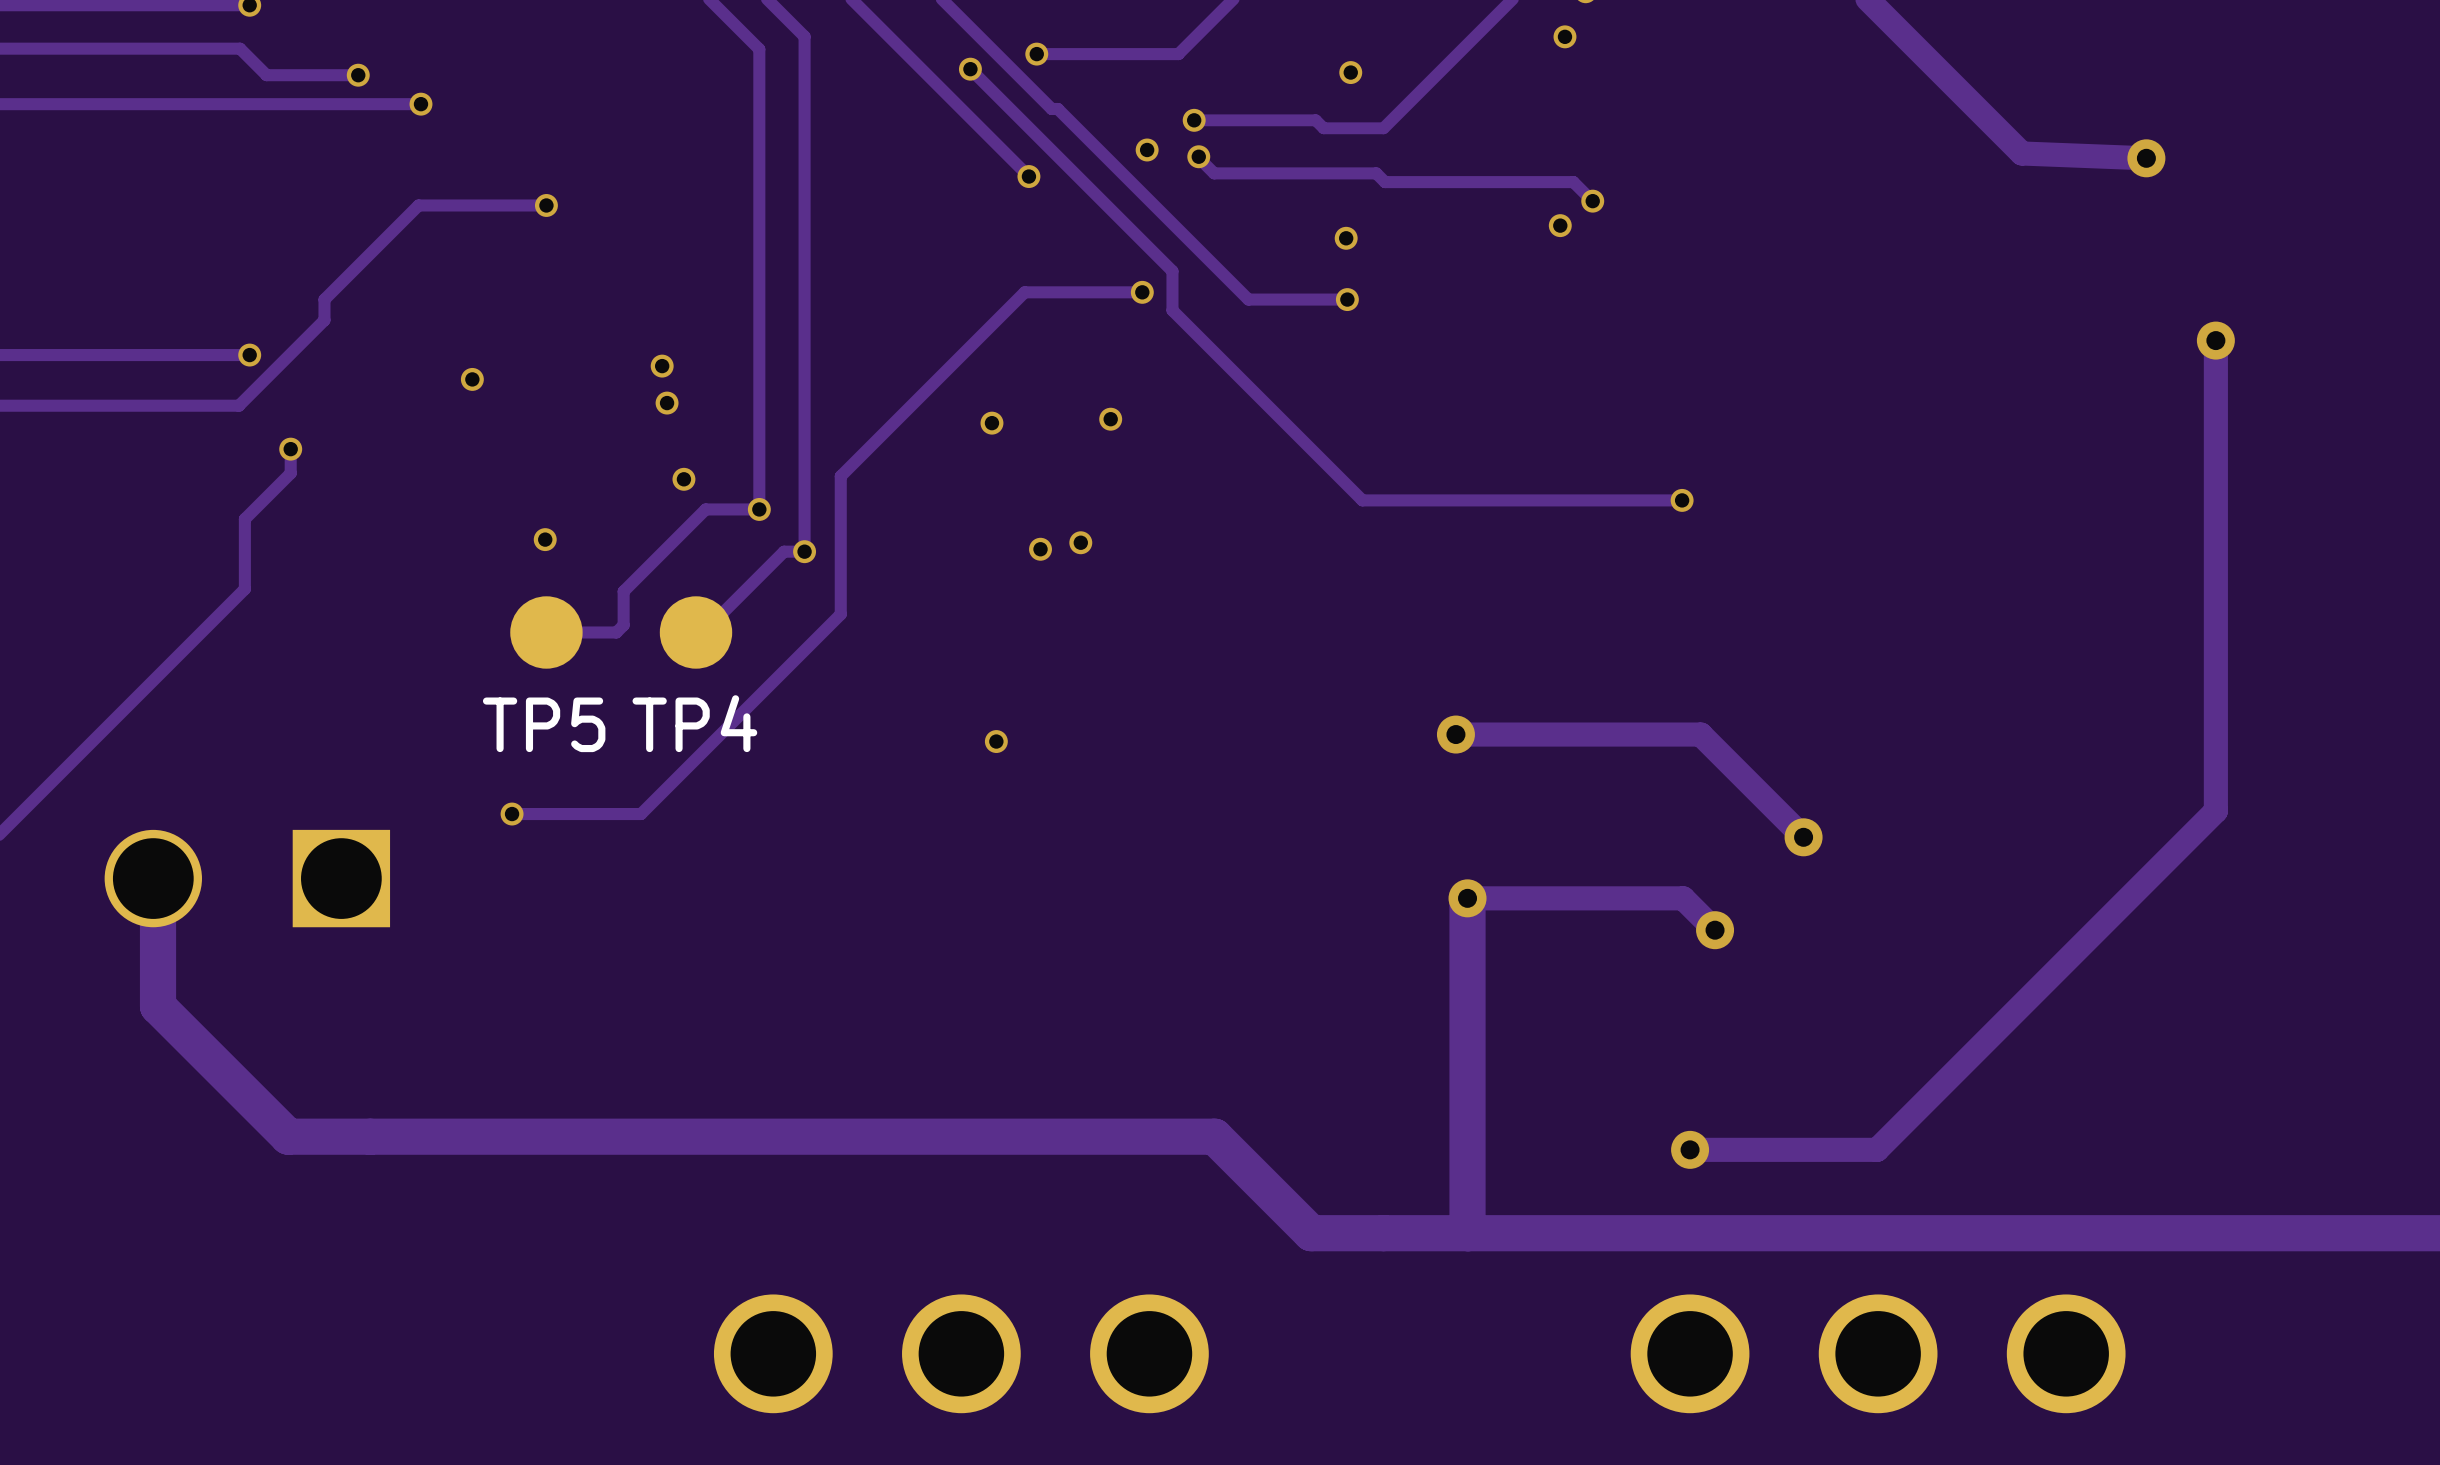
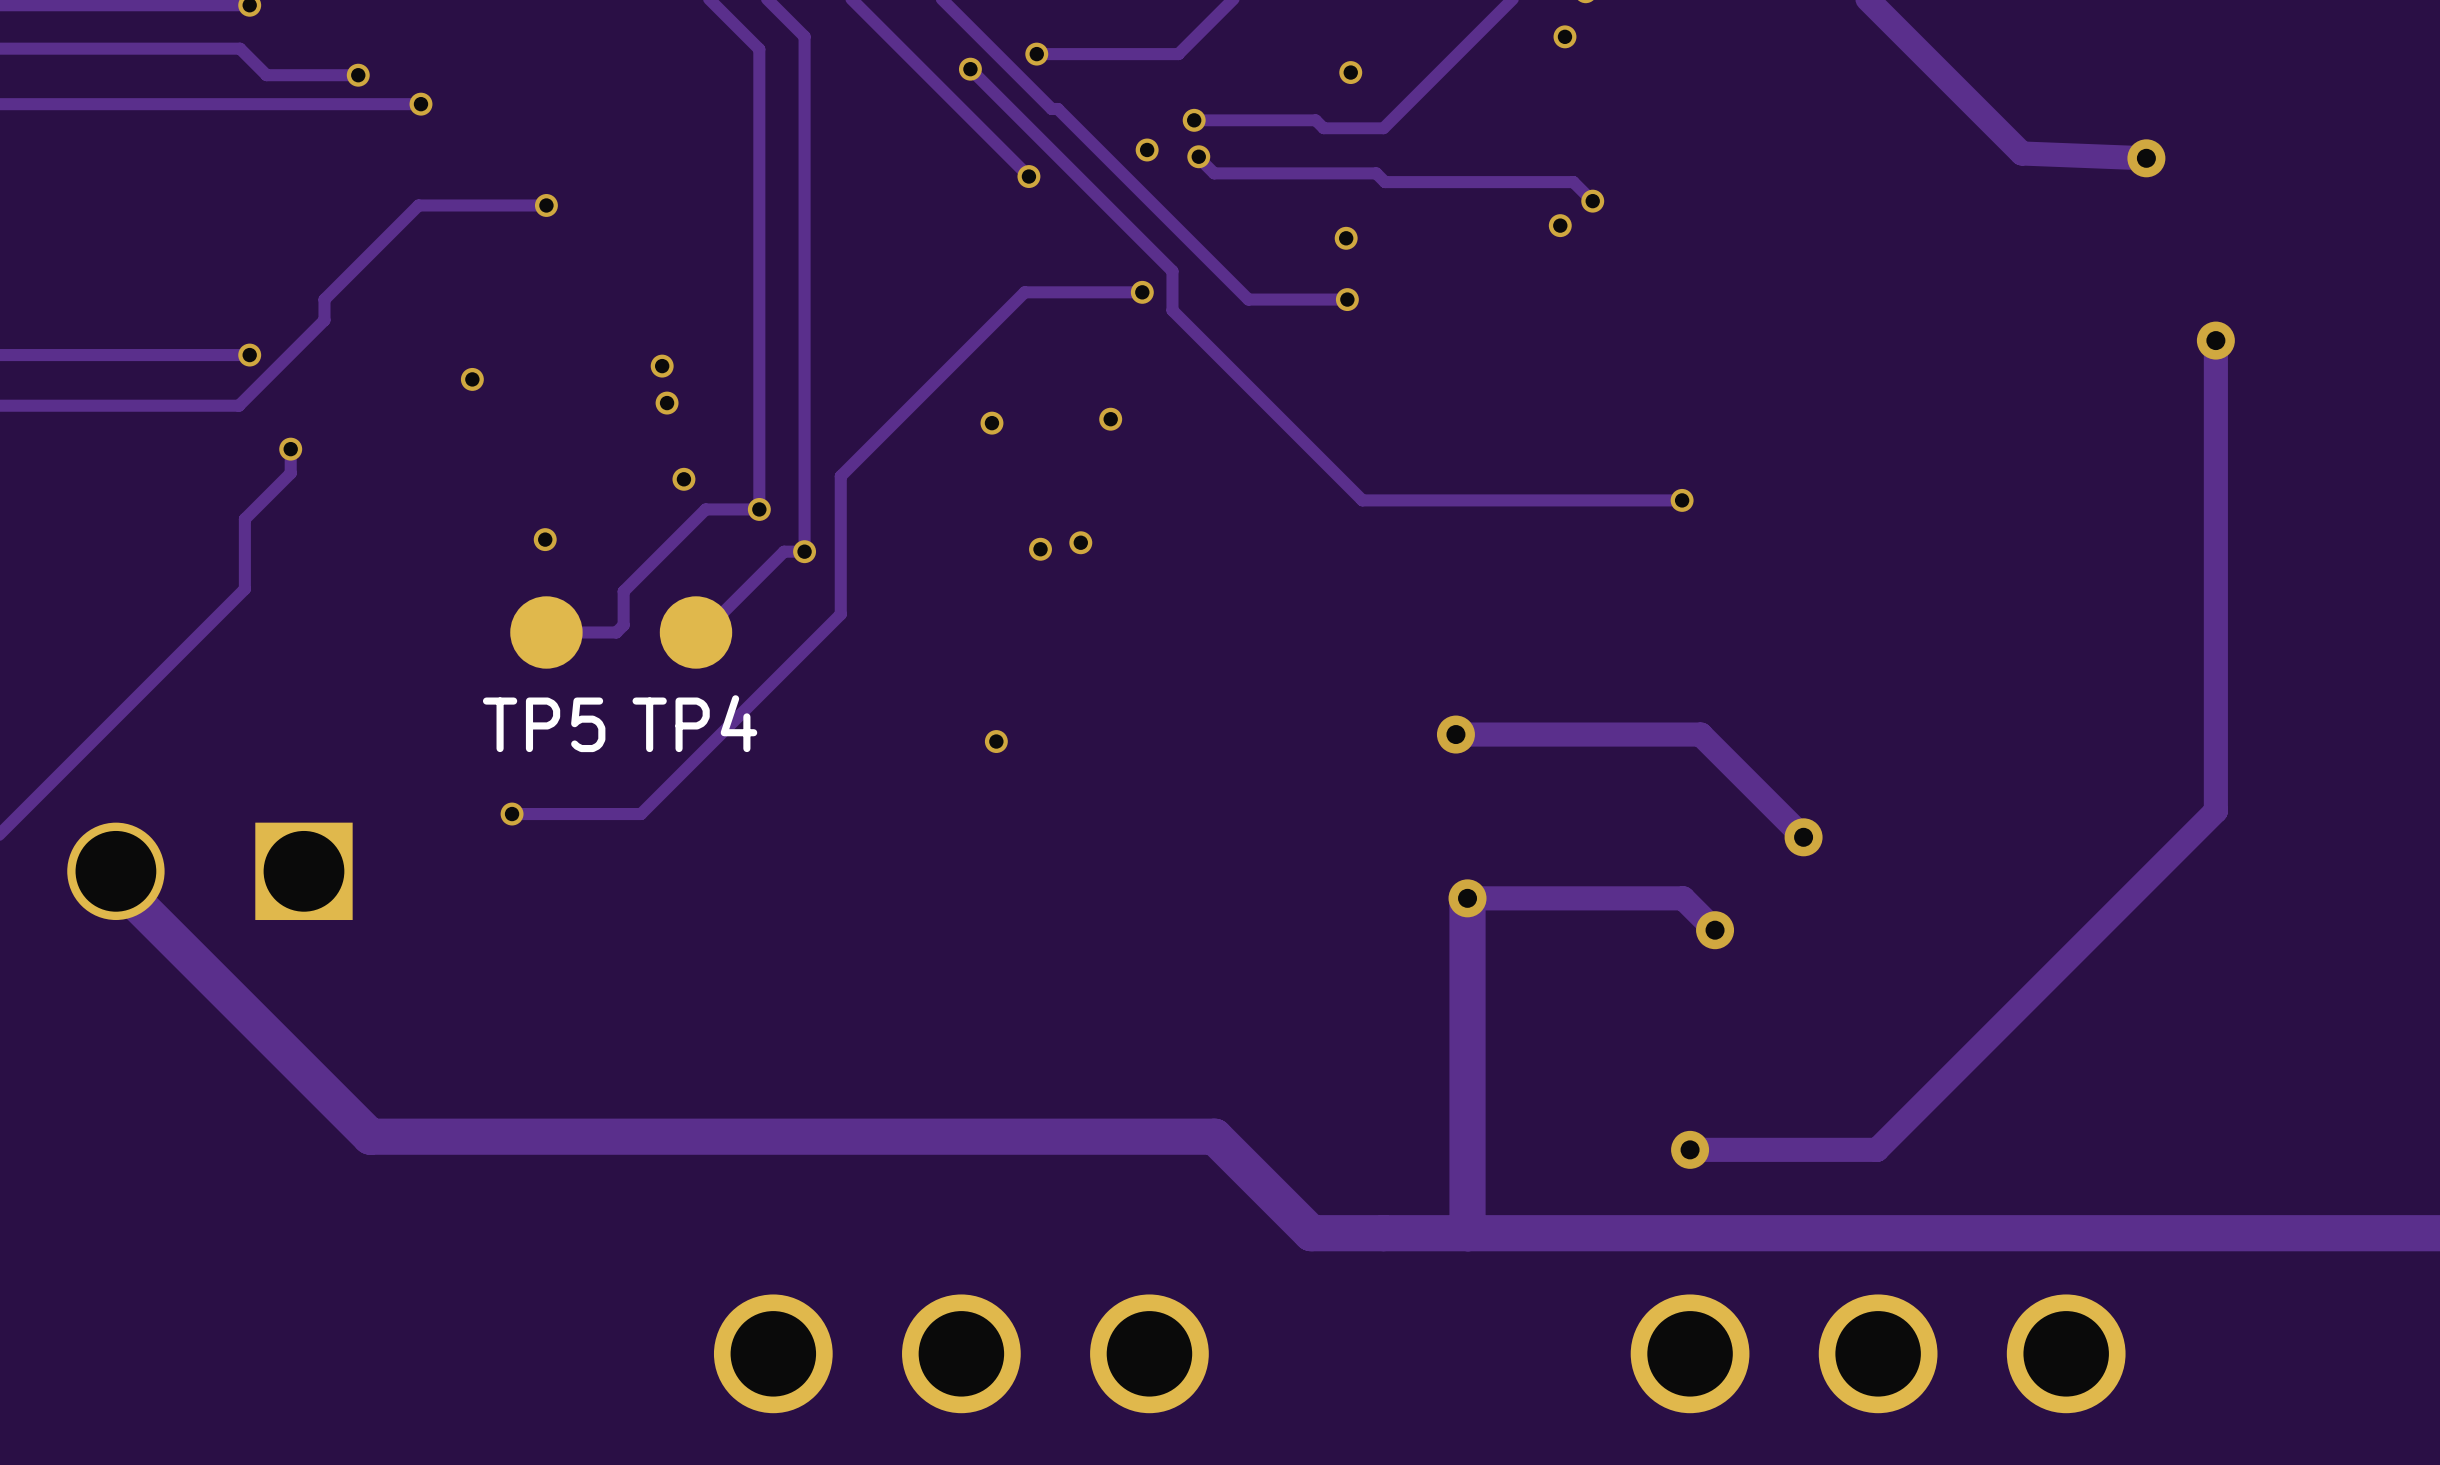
track: (158, 871) (158, 1006) (288, 1136) (370, 1136) -> (115, 871) (104, 871) (370, 1136)
part position: (247, 878) -> (209, 871)

